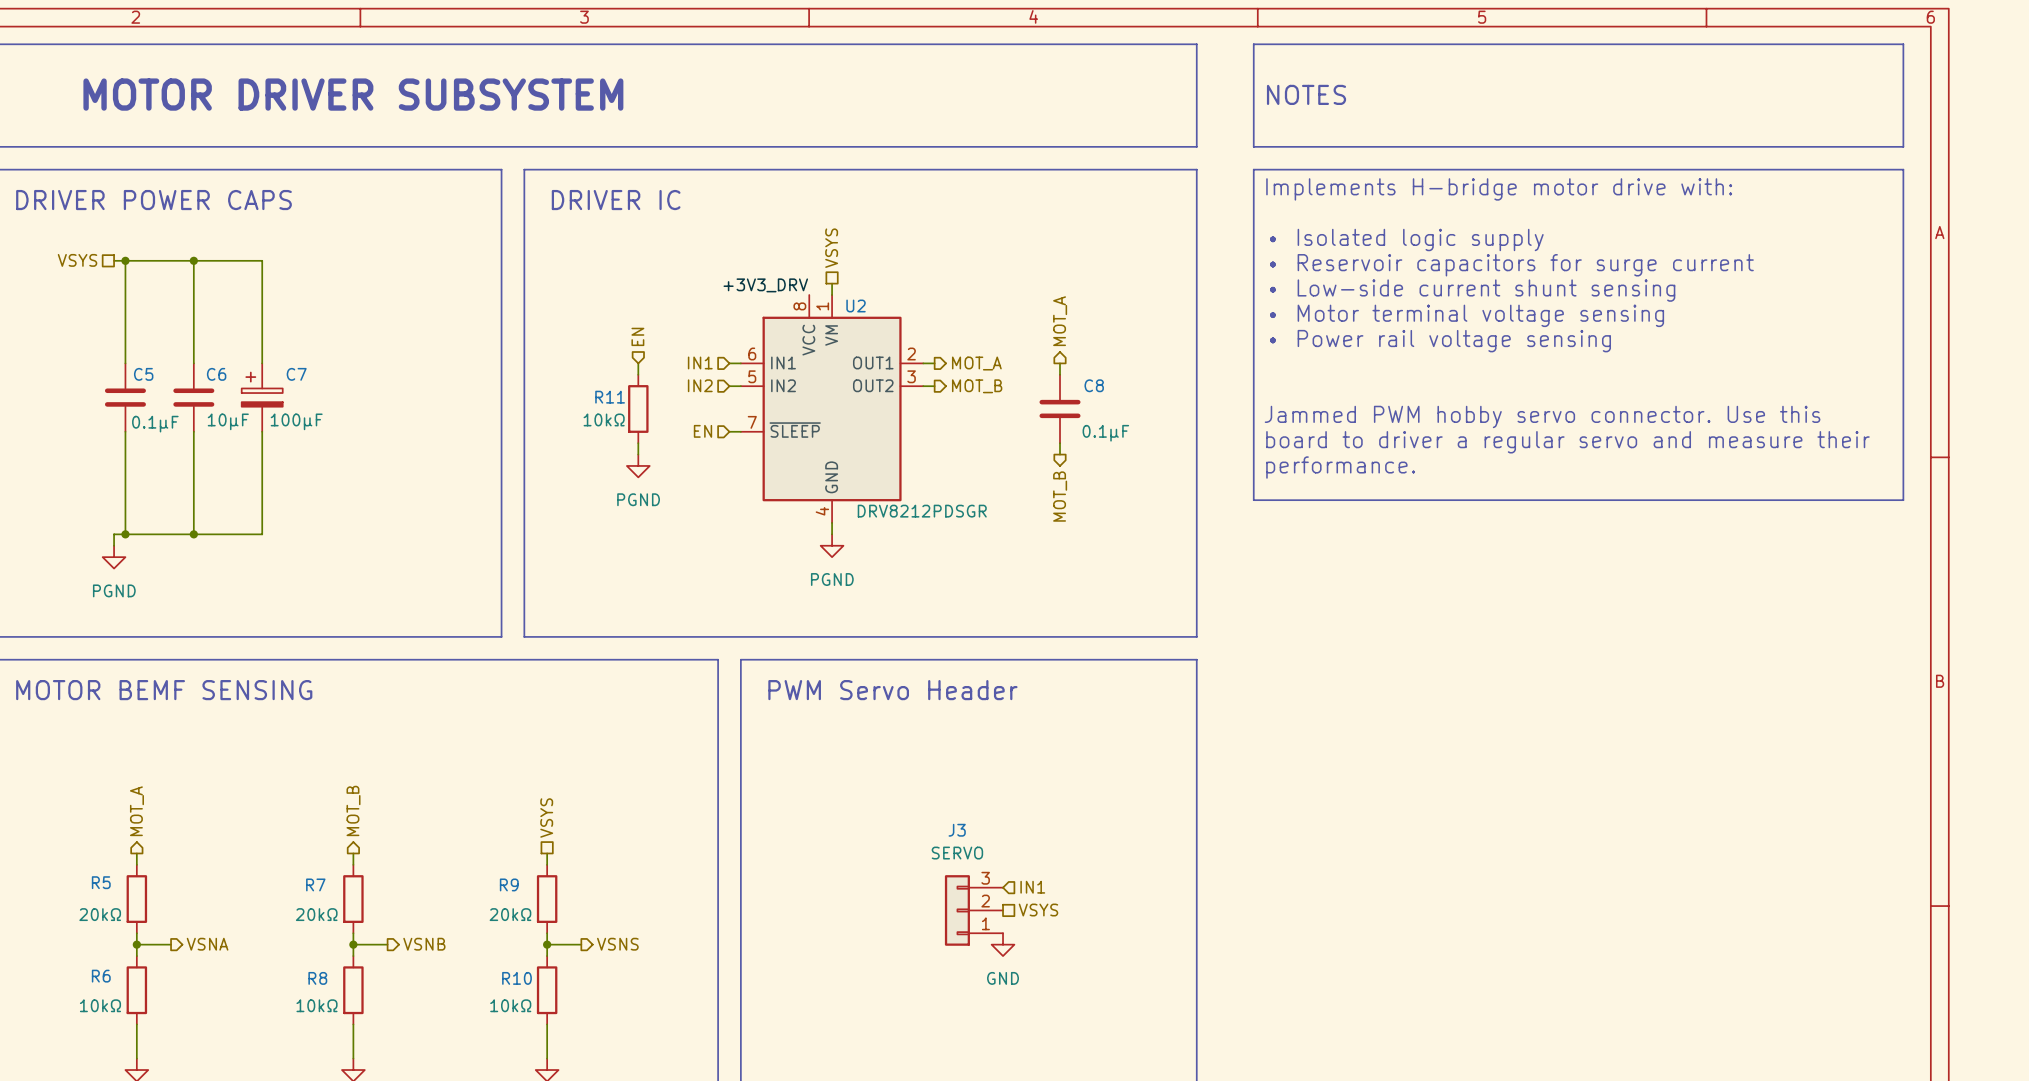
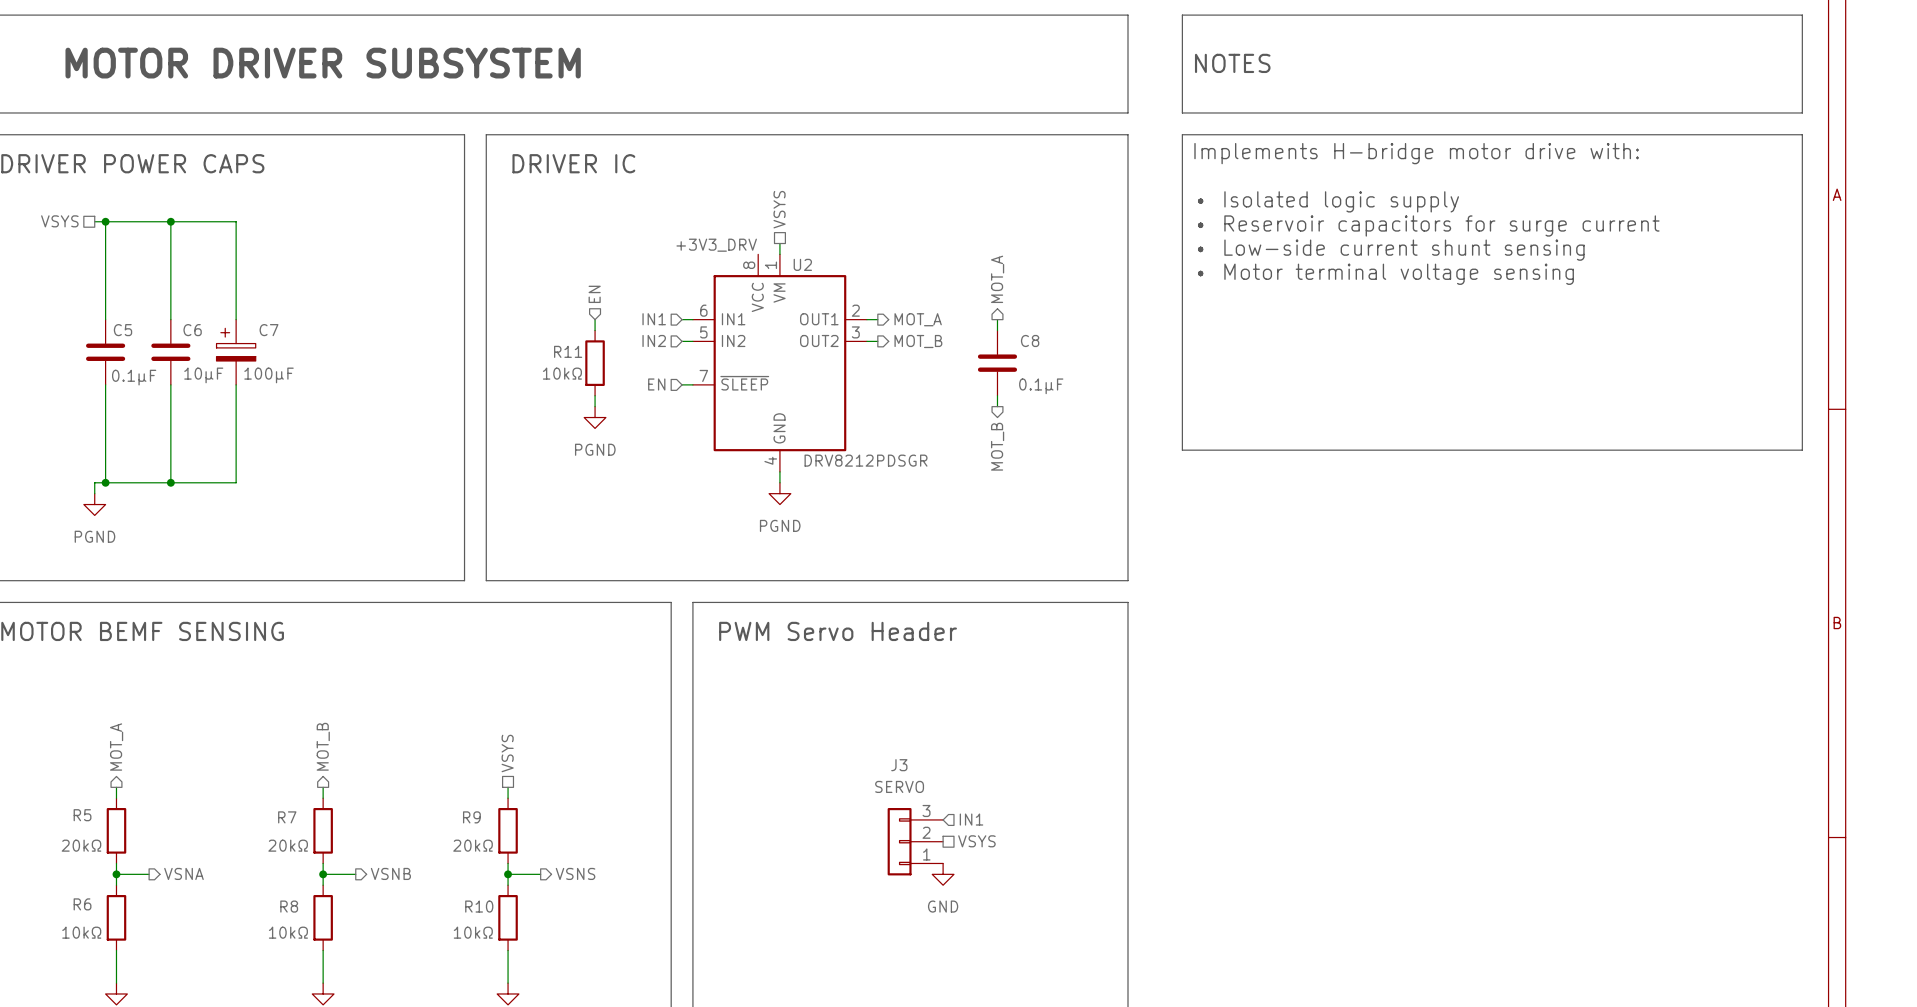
text: • Power rail voltage sensing (1440, 341) -> none
text: Jammed PWM hobby servo connector. Use this (1542, 416) -> none
text: board to driver a regular servo and measure their (1567, 442) -> none
text: performance. (1340, 467) -> none

